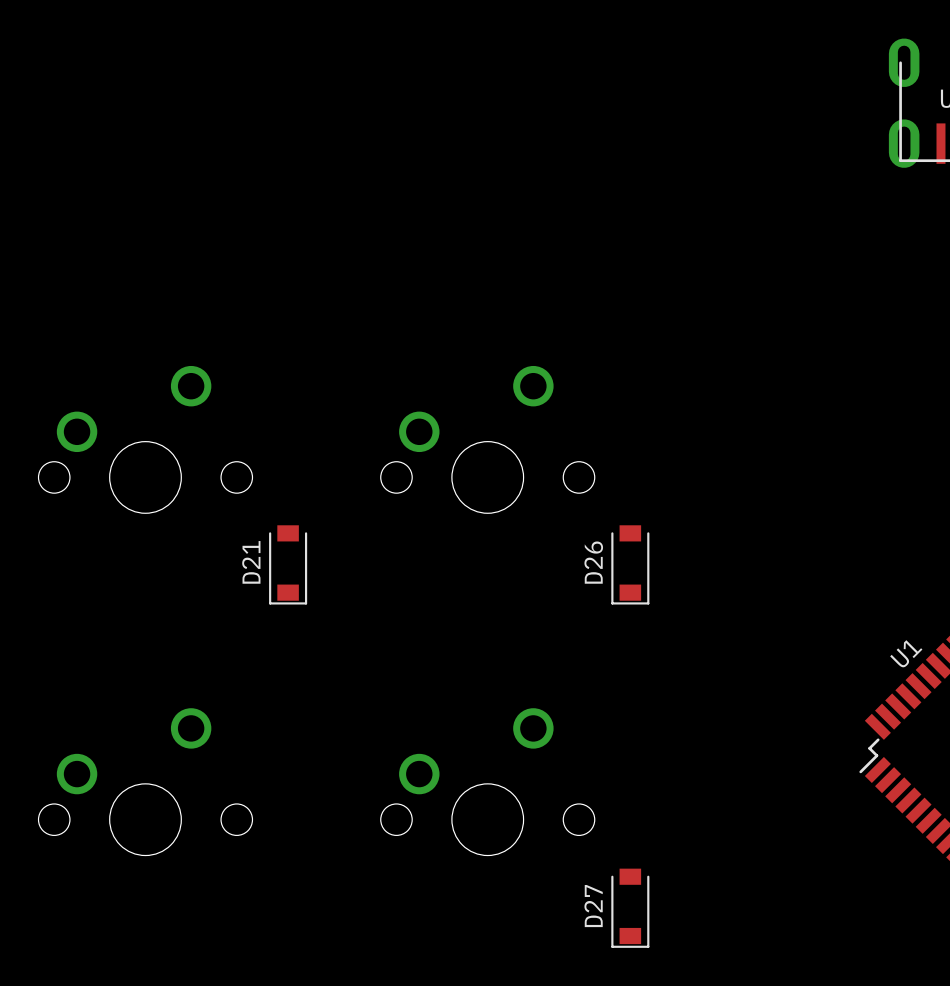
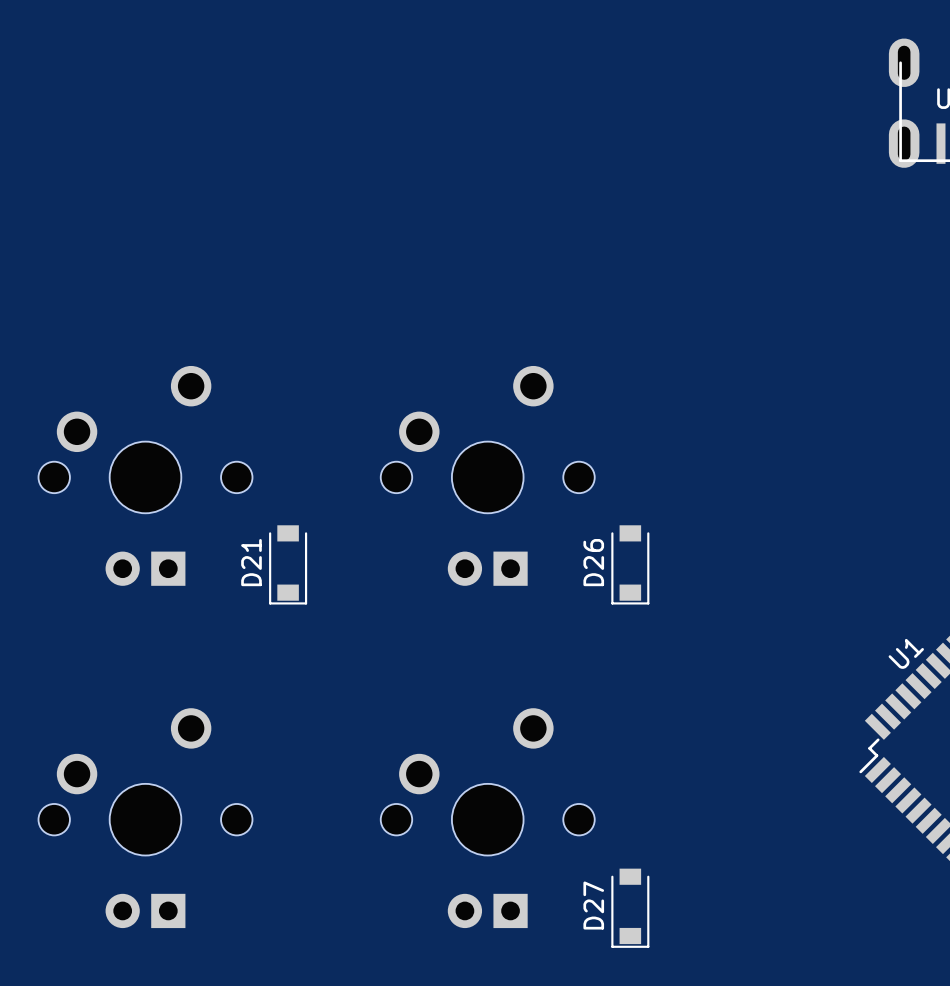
part: none -> (145, 475)
part: none -> (487, 475)
part: none -> (145, 818)
part: none -> (487, 818)

